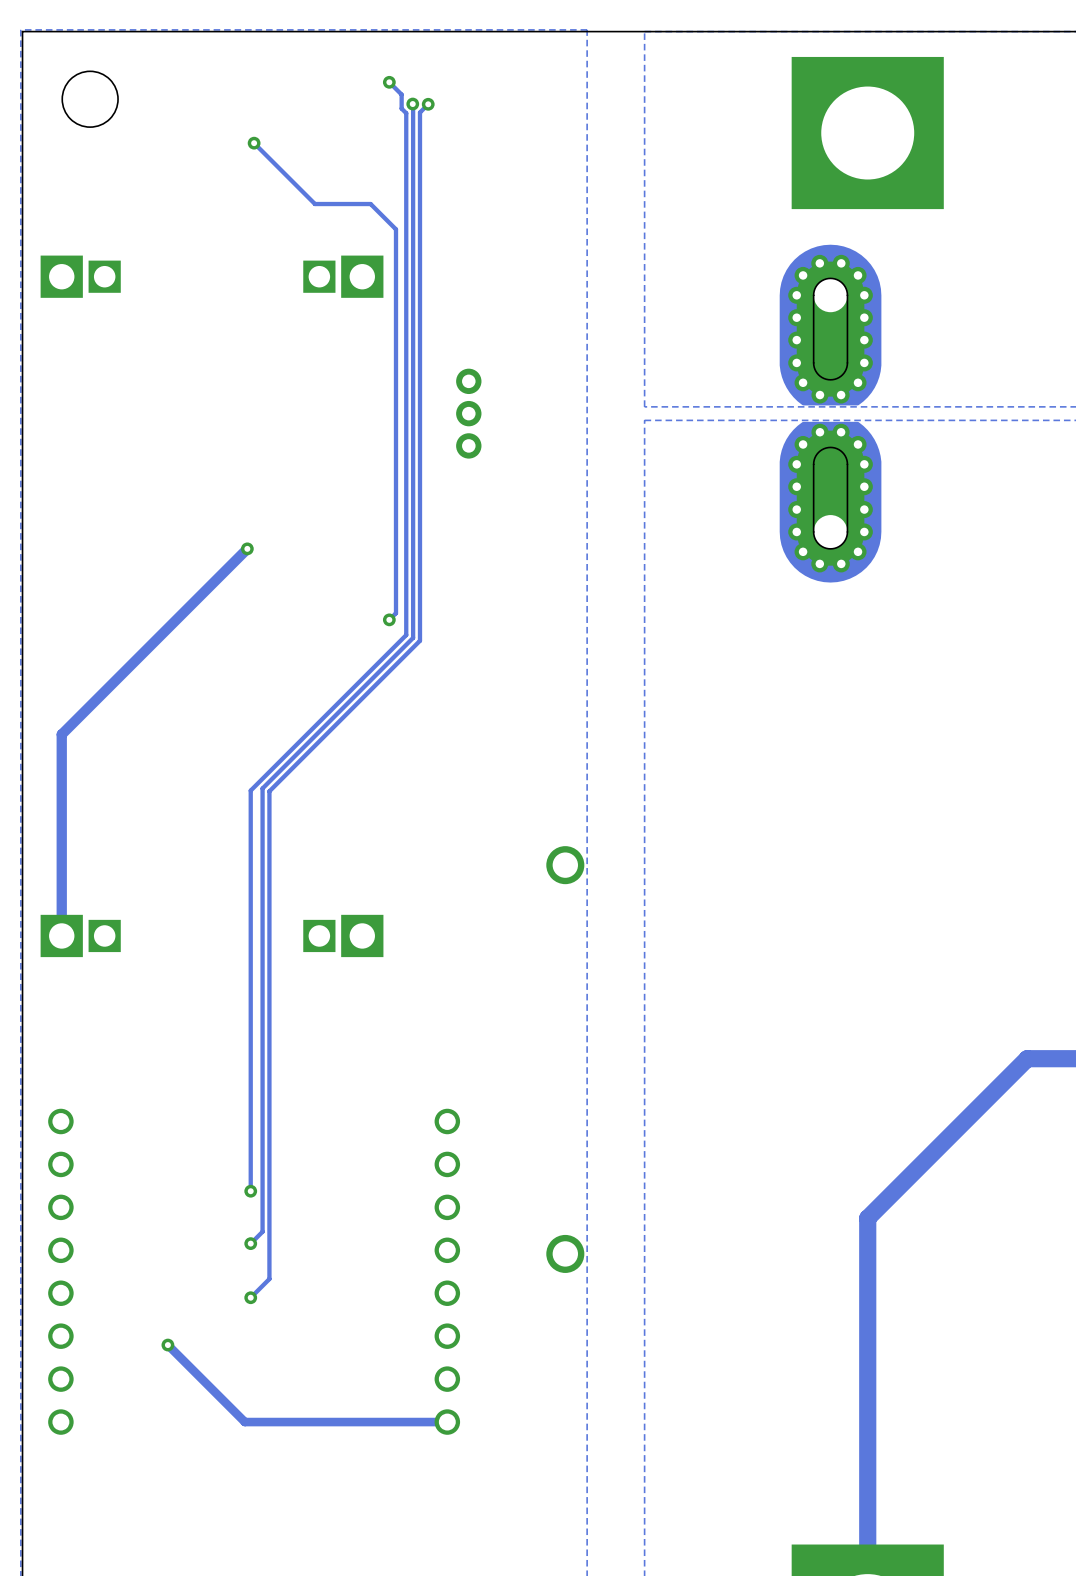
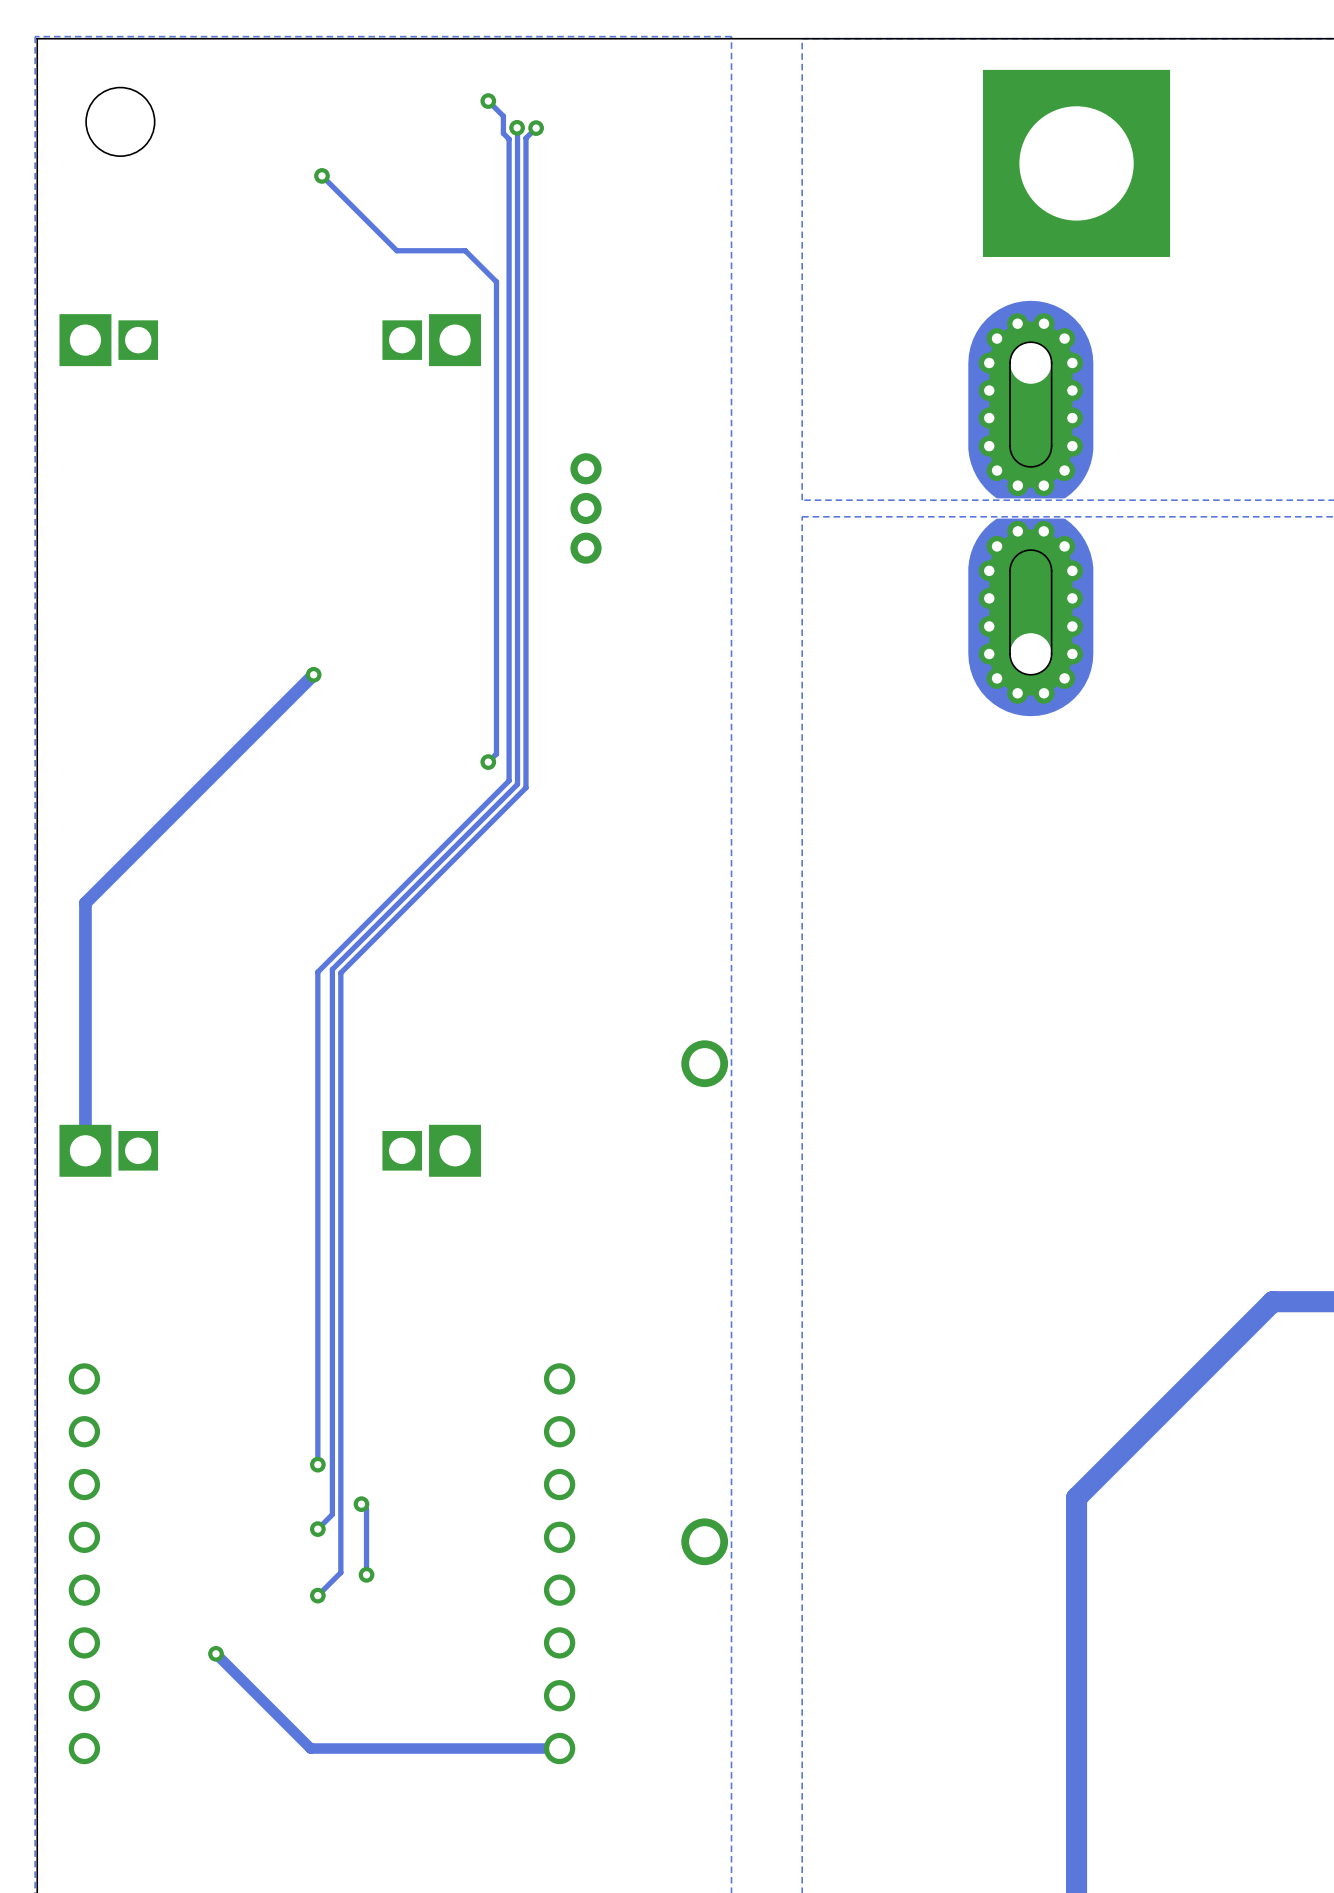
track: none -> (361, 1504) (366, 1509) (366, 1574)
via: none -> (361, 1504)
via: none -> (366, 1574)

